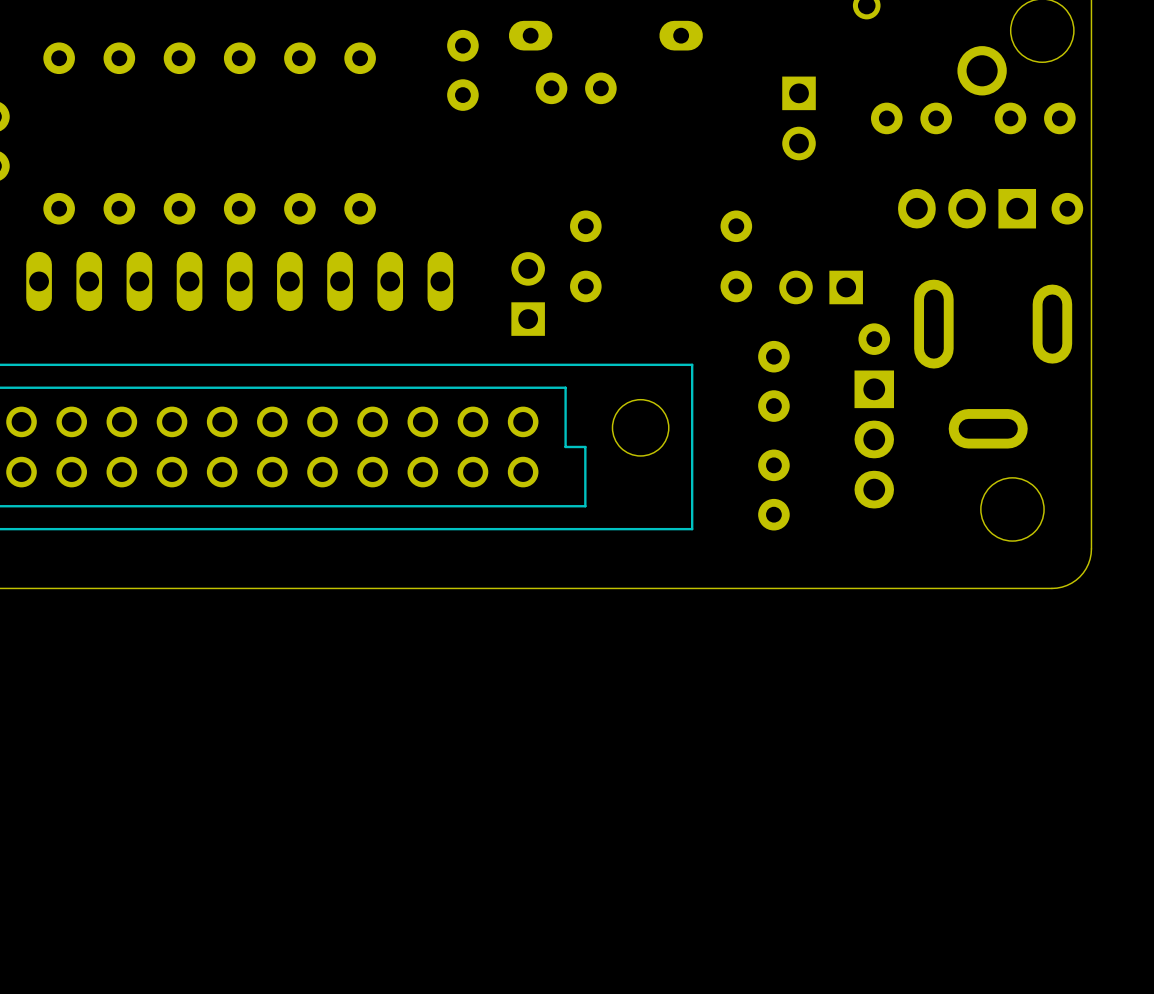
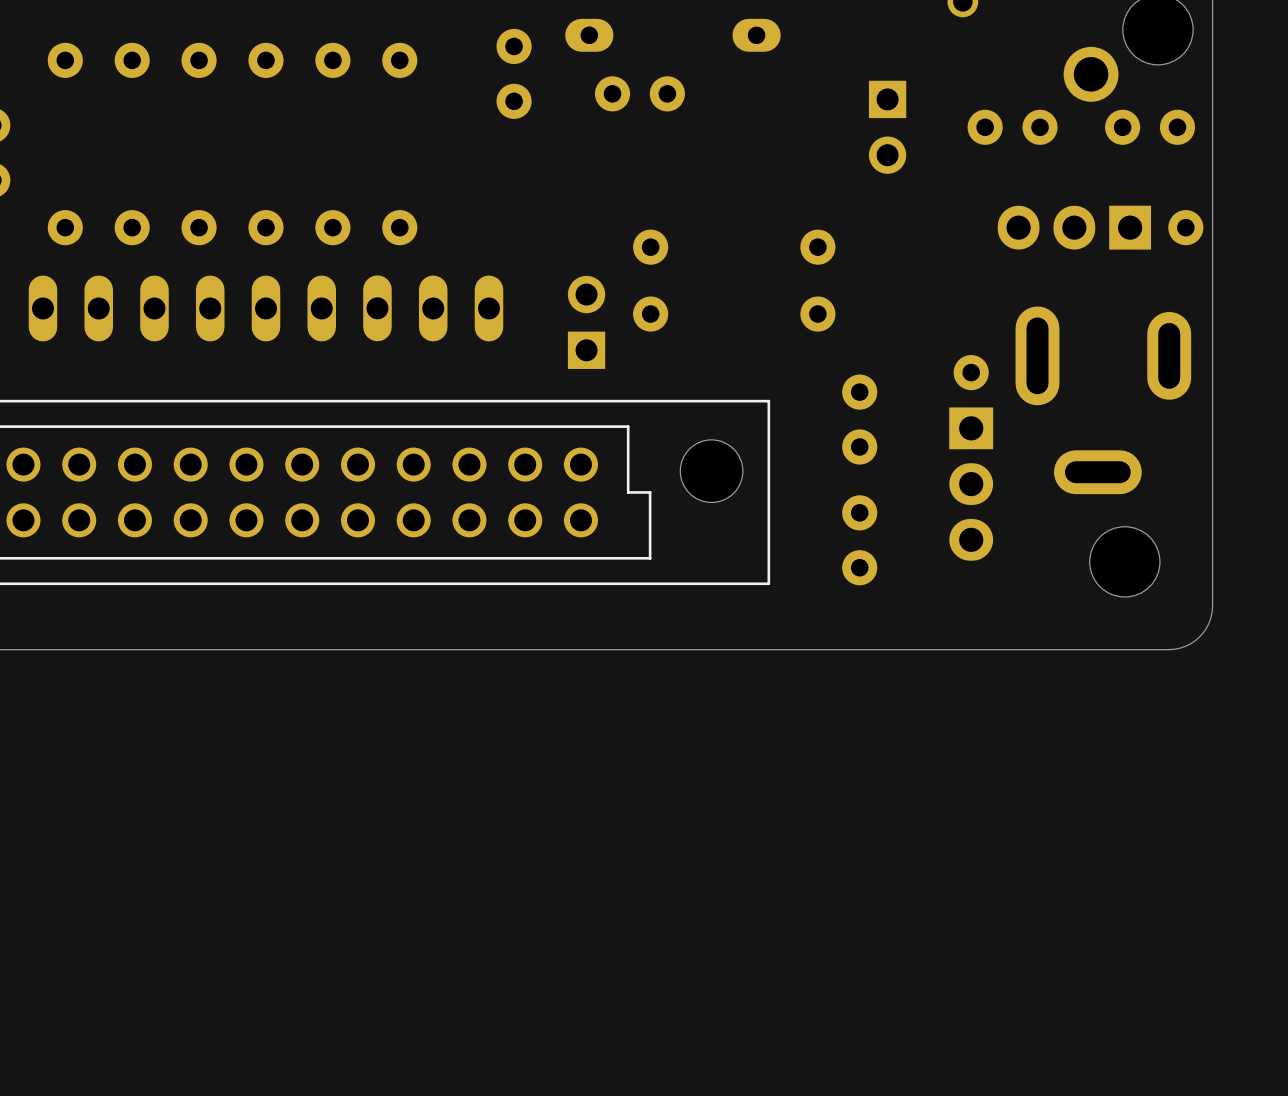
part: (821, 287) -> none

